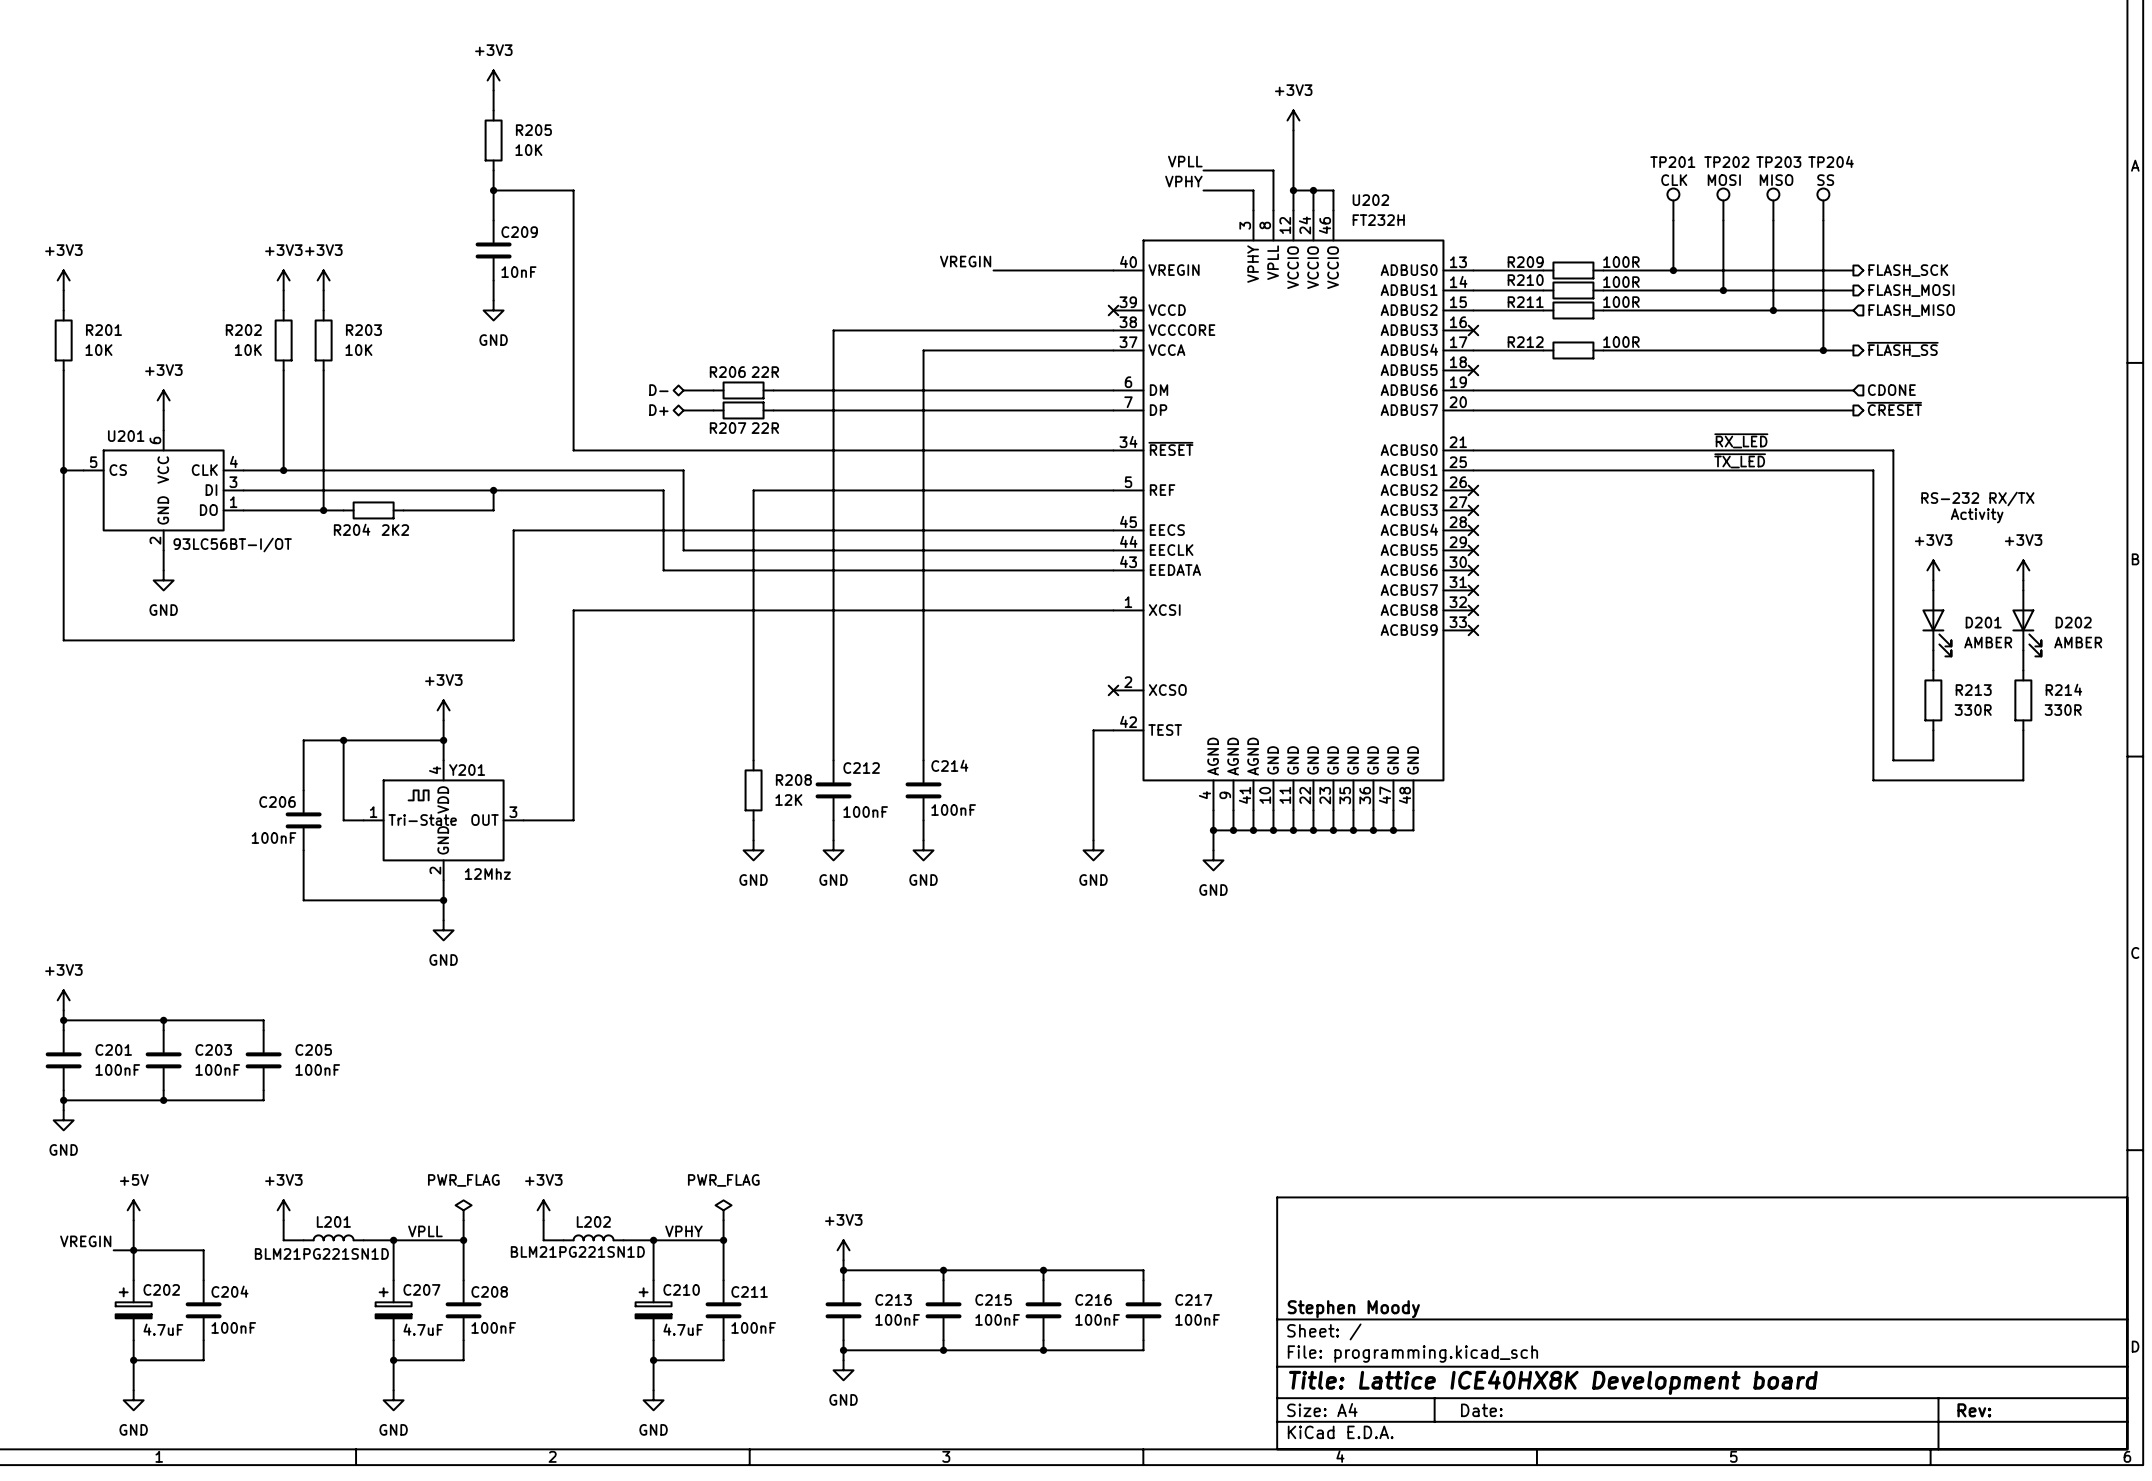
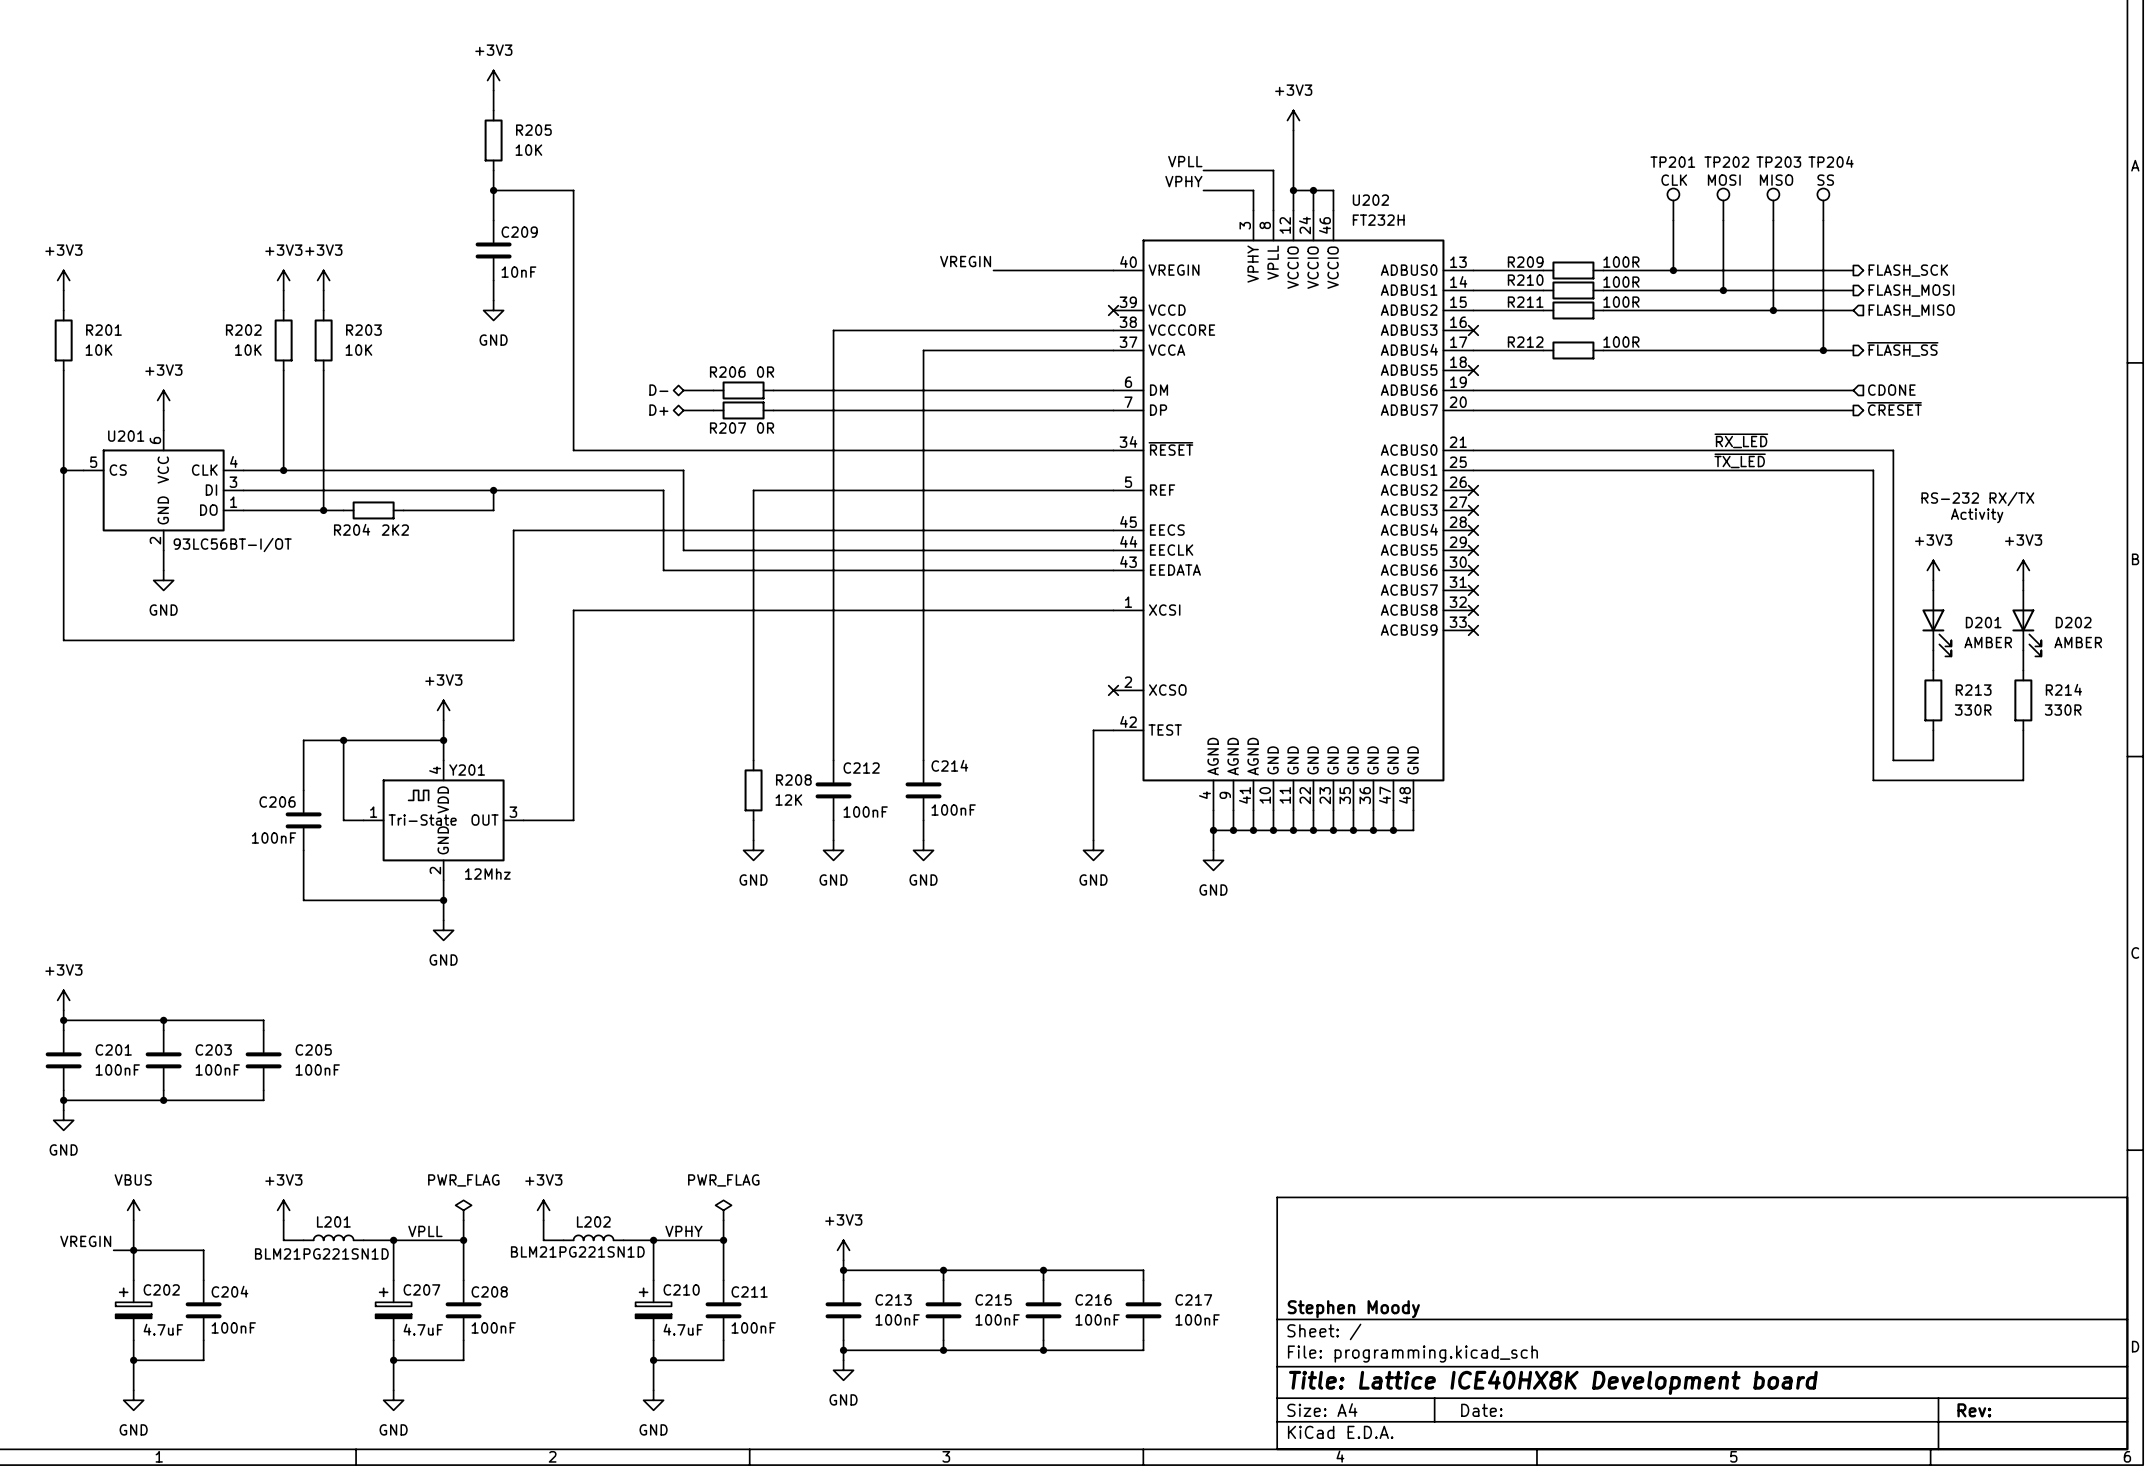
R206 value: 22R (765, 372) -> 0R (765, 372)
R207 value: 22R (765, 428) -> 0R (765, 428)
power symbol: +5V (133, 1210) -> VBUS (133, 1210)

